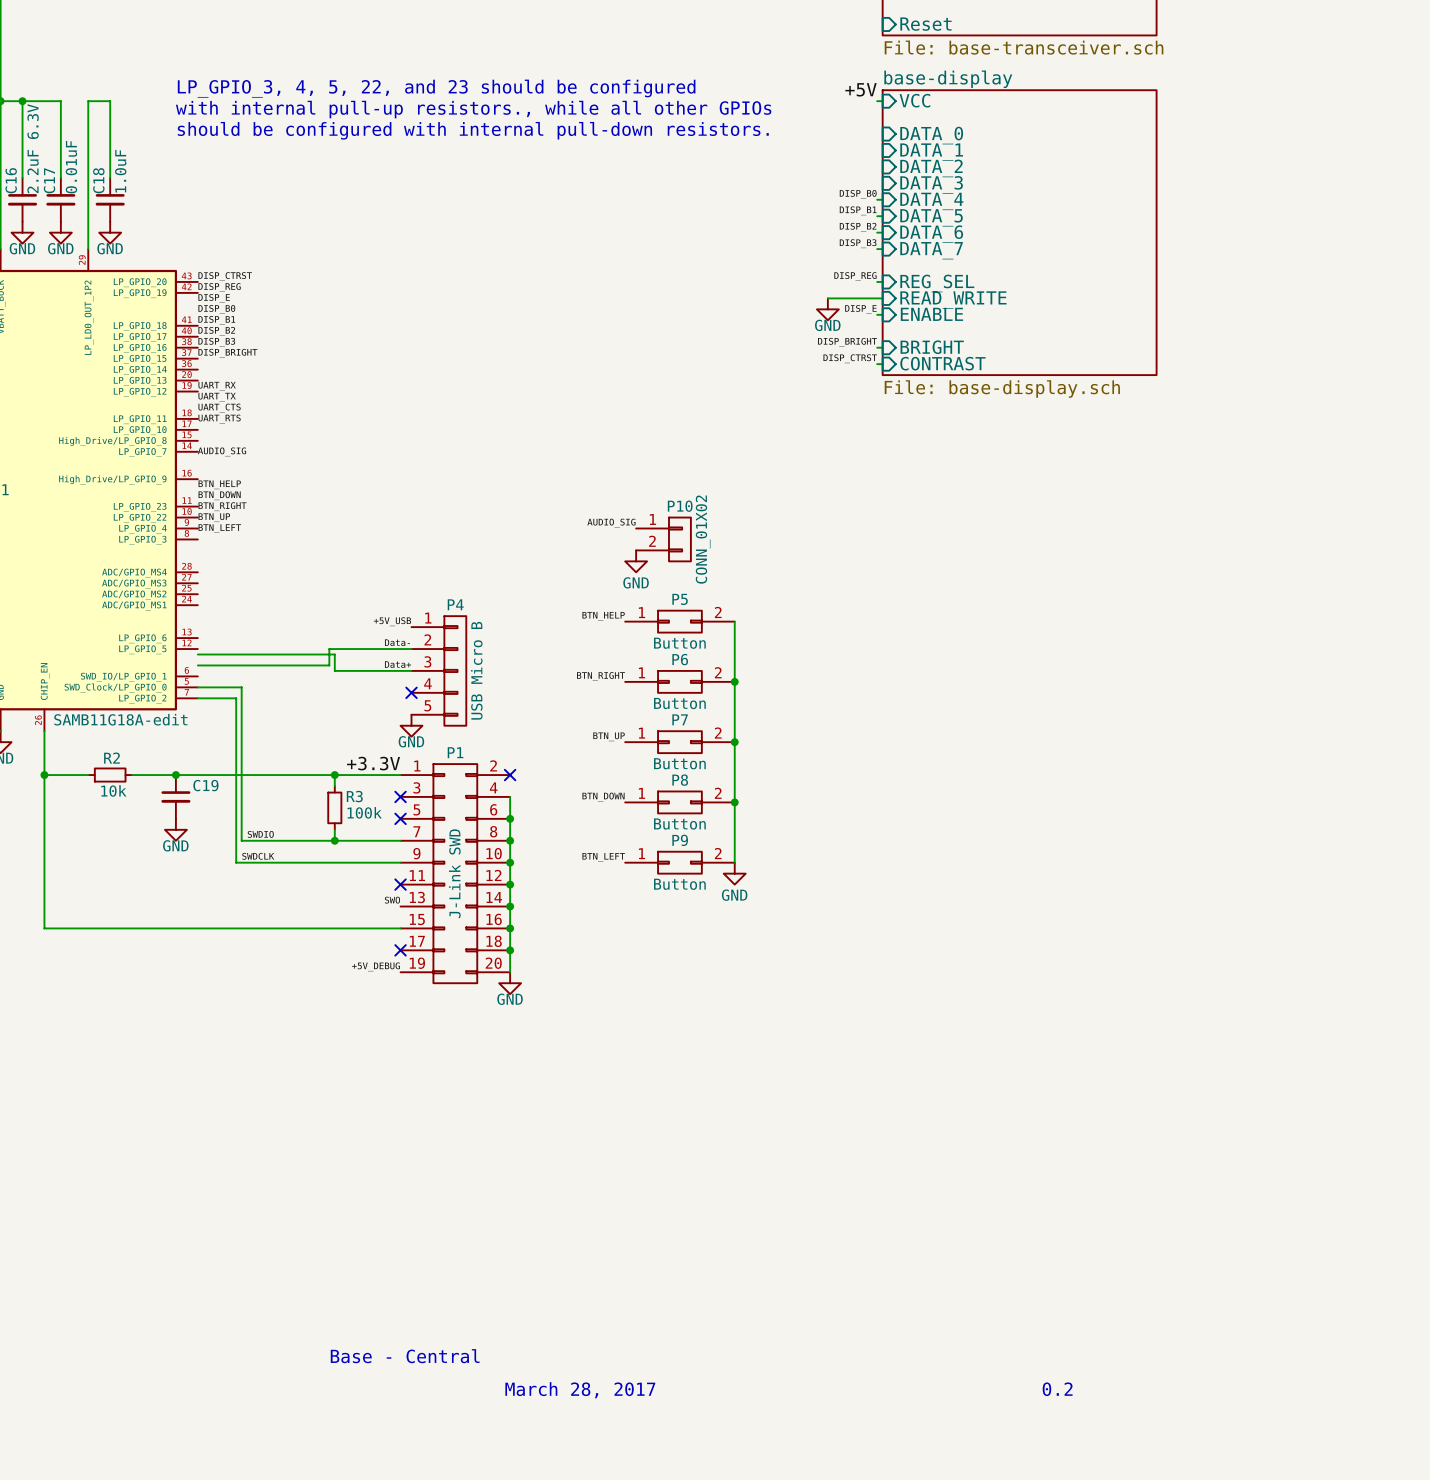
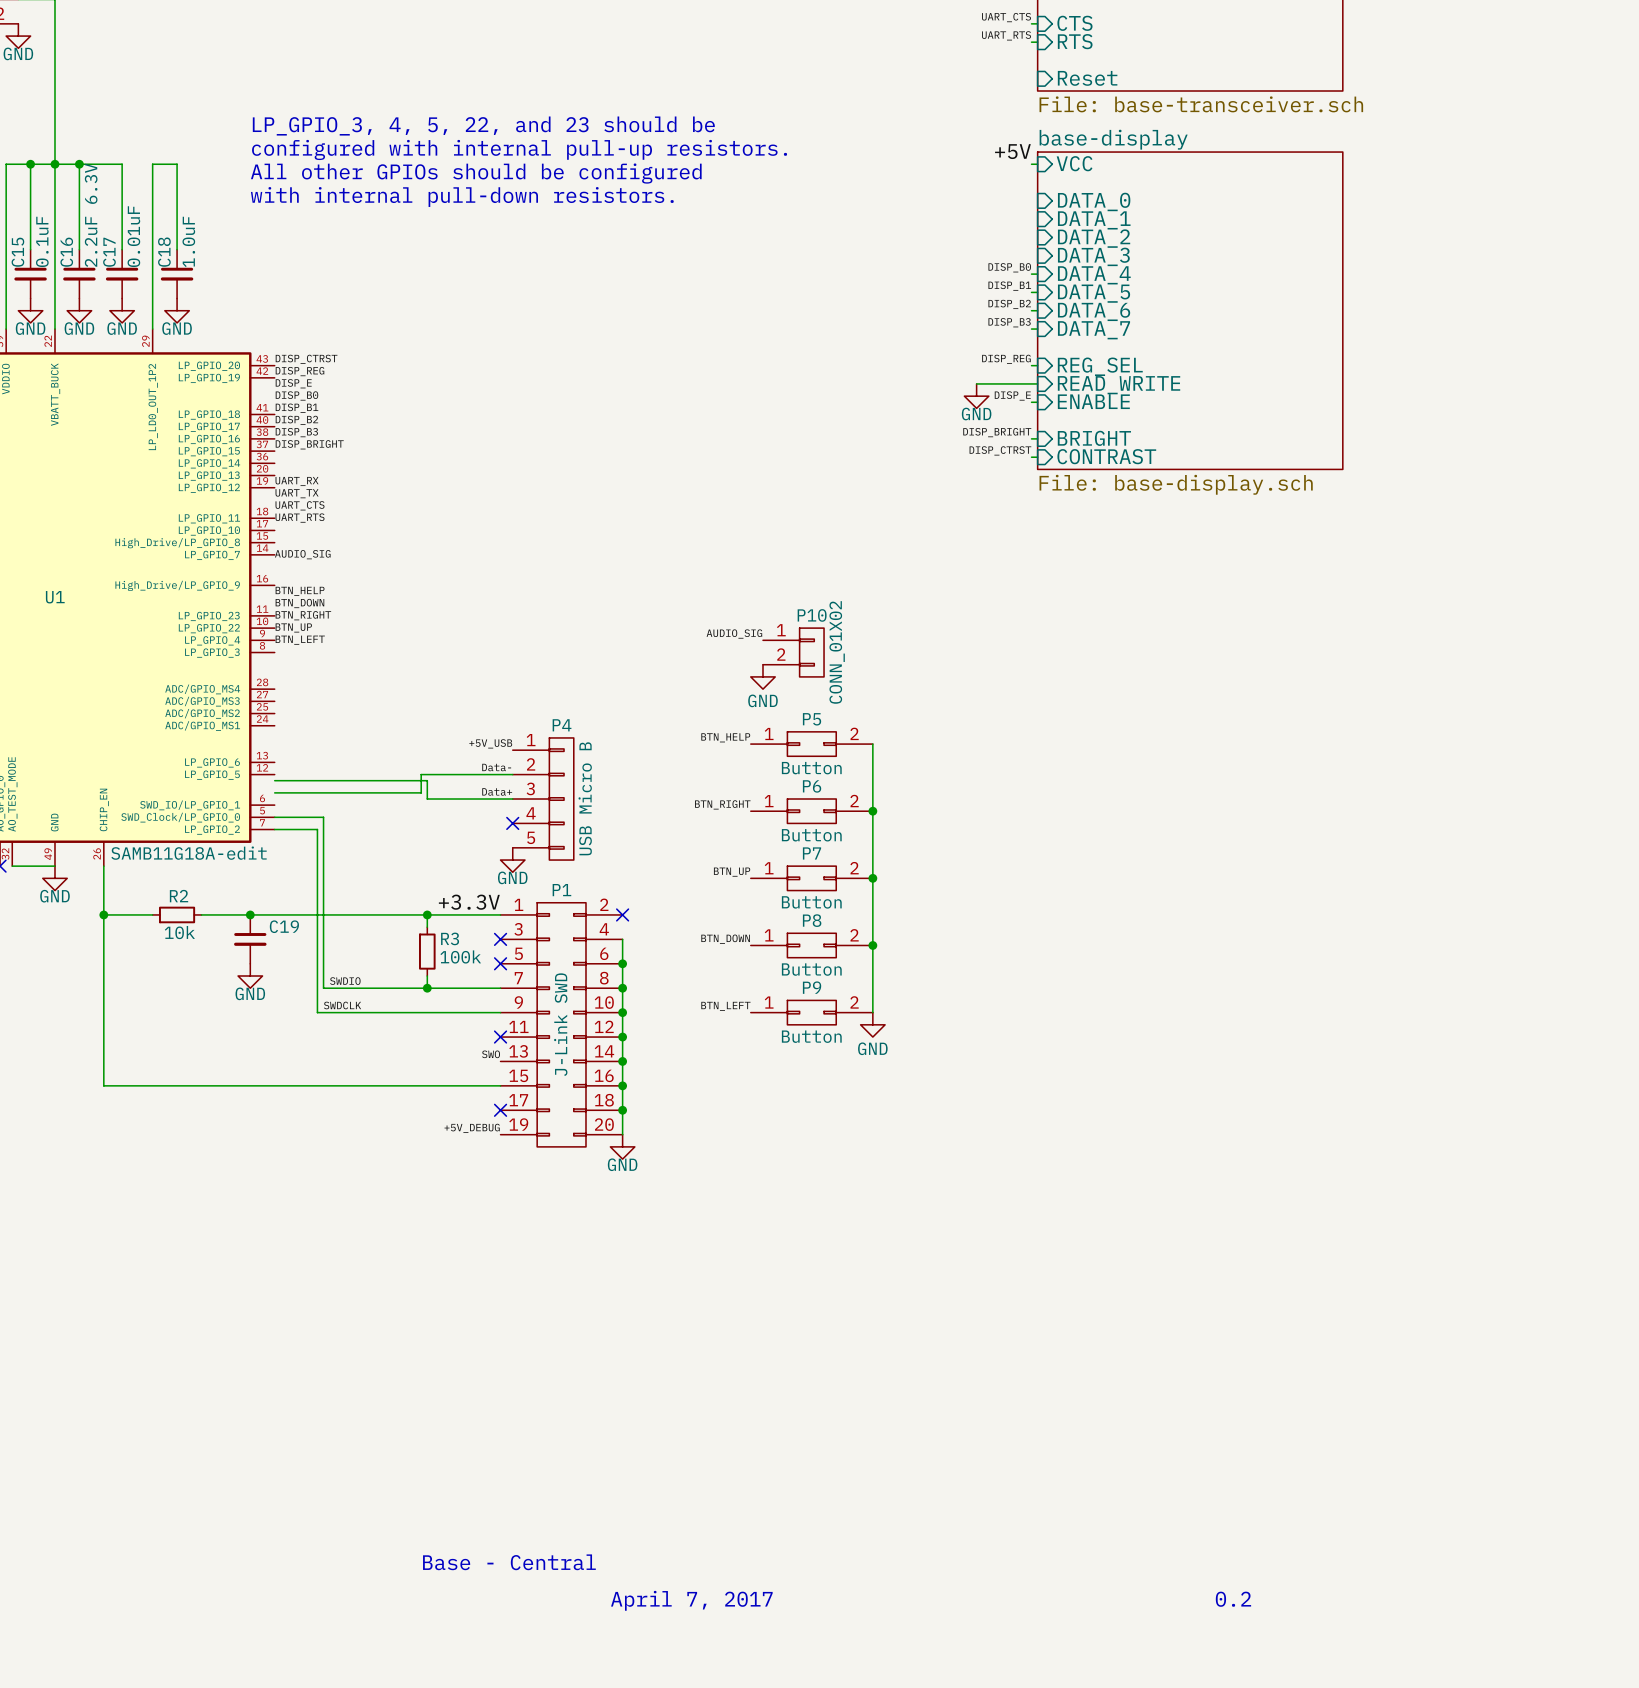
text: none -> LP_GPIO_3, 4, 5, 22, and 23 should be (483, 126)
text: LP_GPIO_3, 4, 5, 22, and 23 should be configured (436, 88) -> configured with internal pull-up resistors. (519, 149)
text: with internal pull-up resistors., while all other GPIOs (473, 109) -> All other GPIOs should be configured (476, 173)
text: should be configured with internal pull-down resistors. (473, 130) -> with internal pull-down resistors. (462, 197)
text: March 28, 2017 (580, 1390) -> April 7, 2017 (691, 1600)

